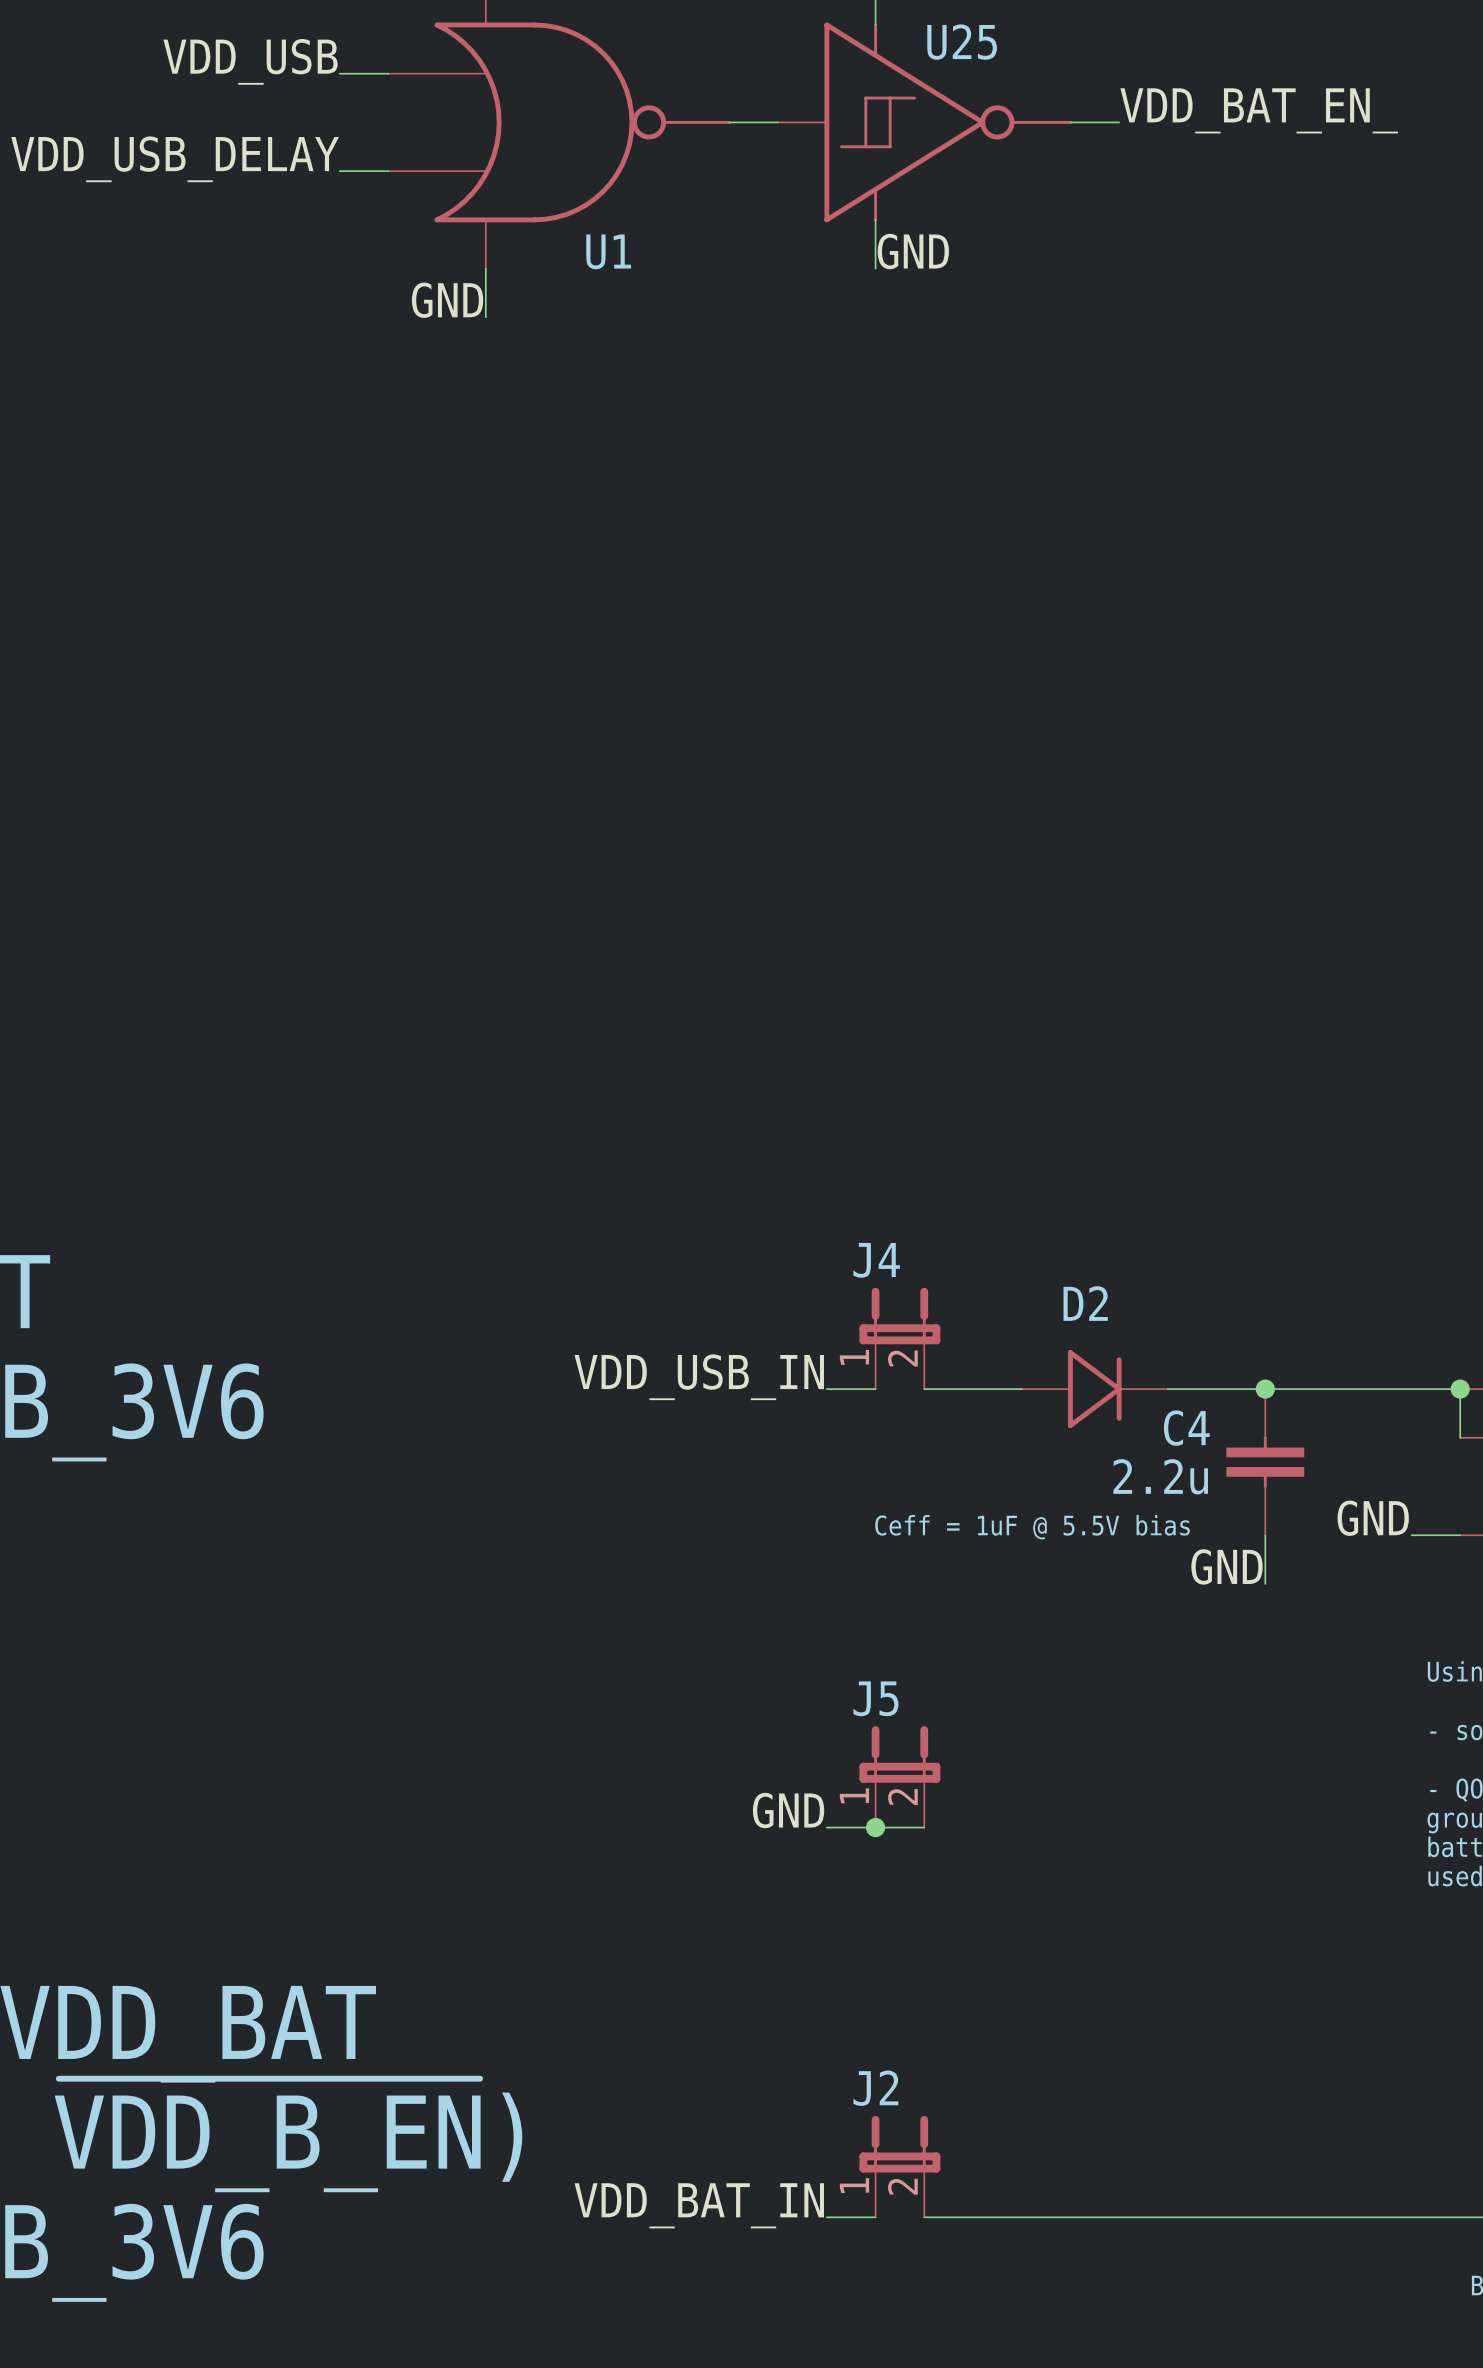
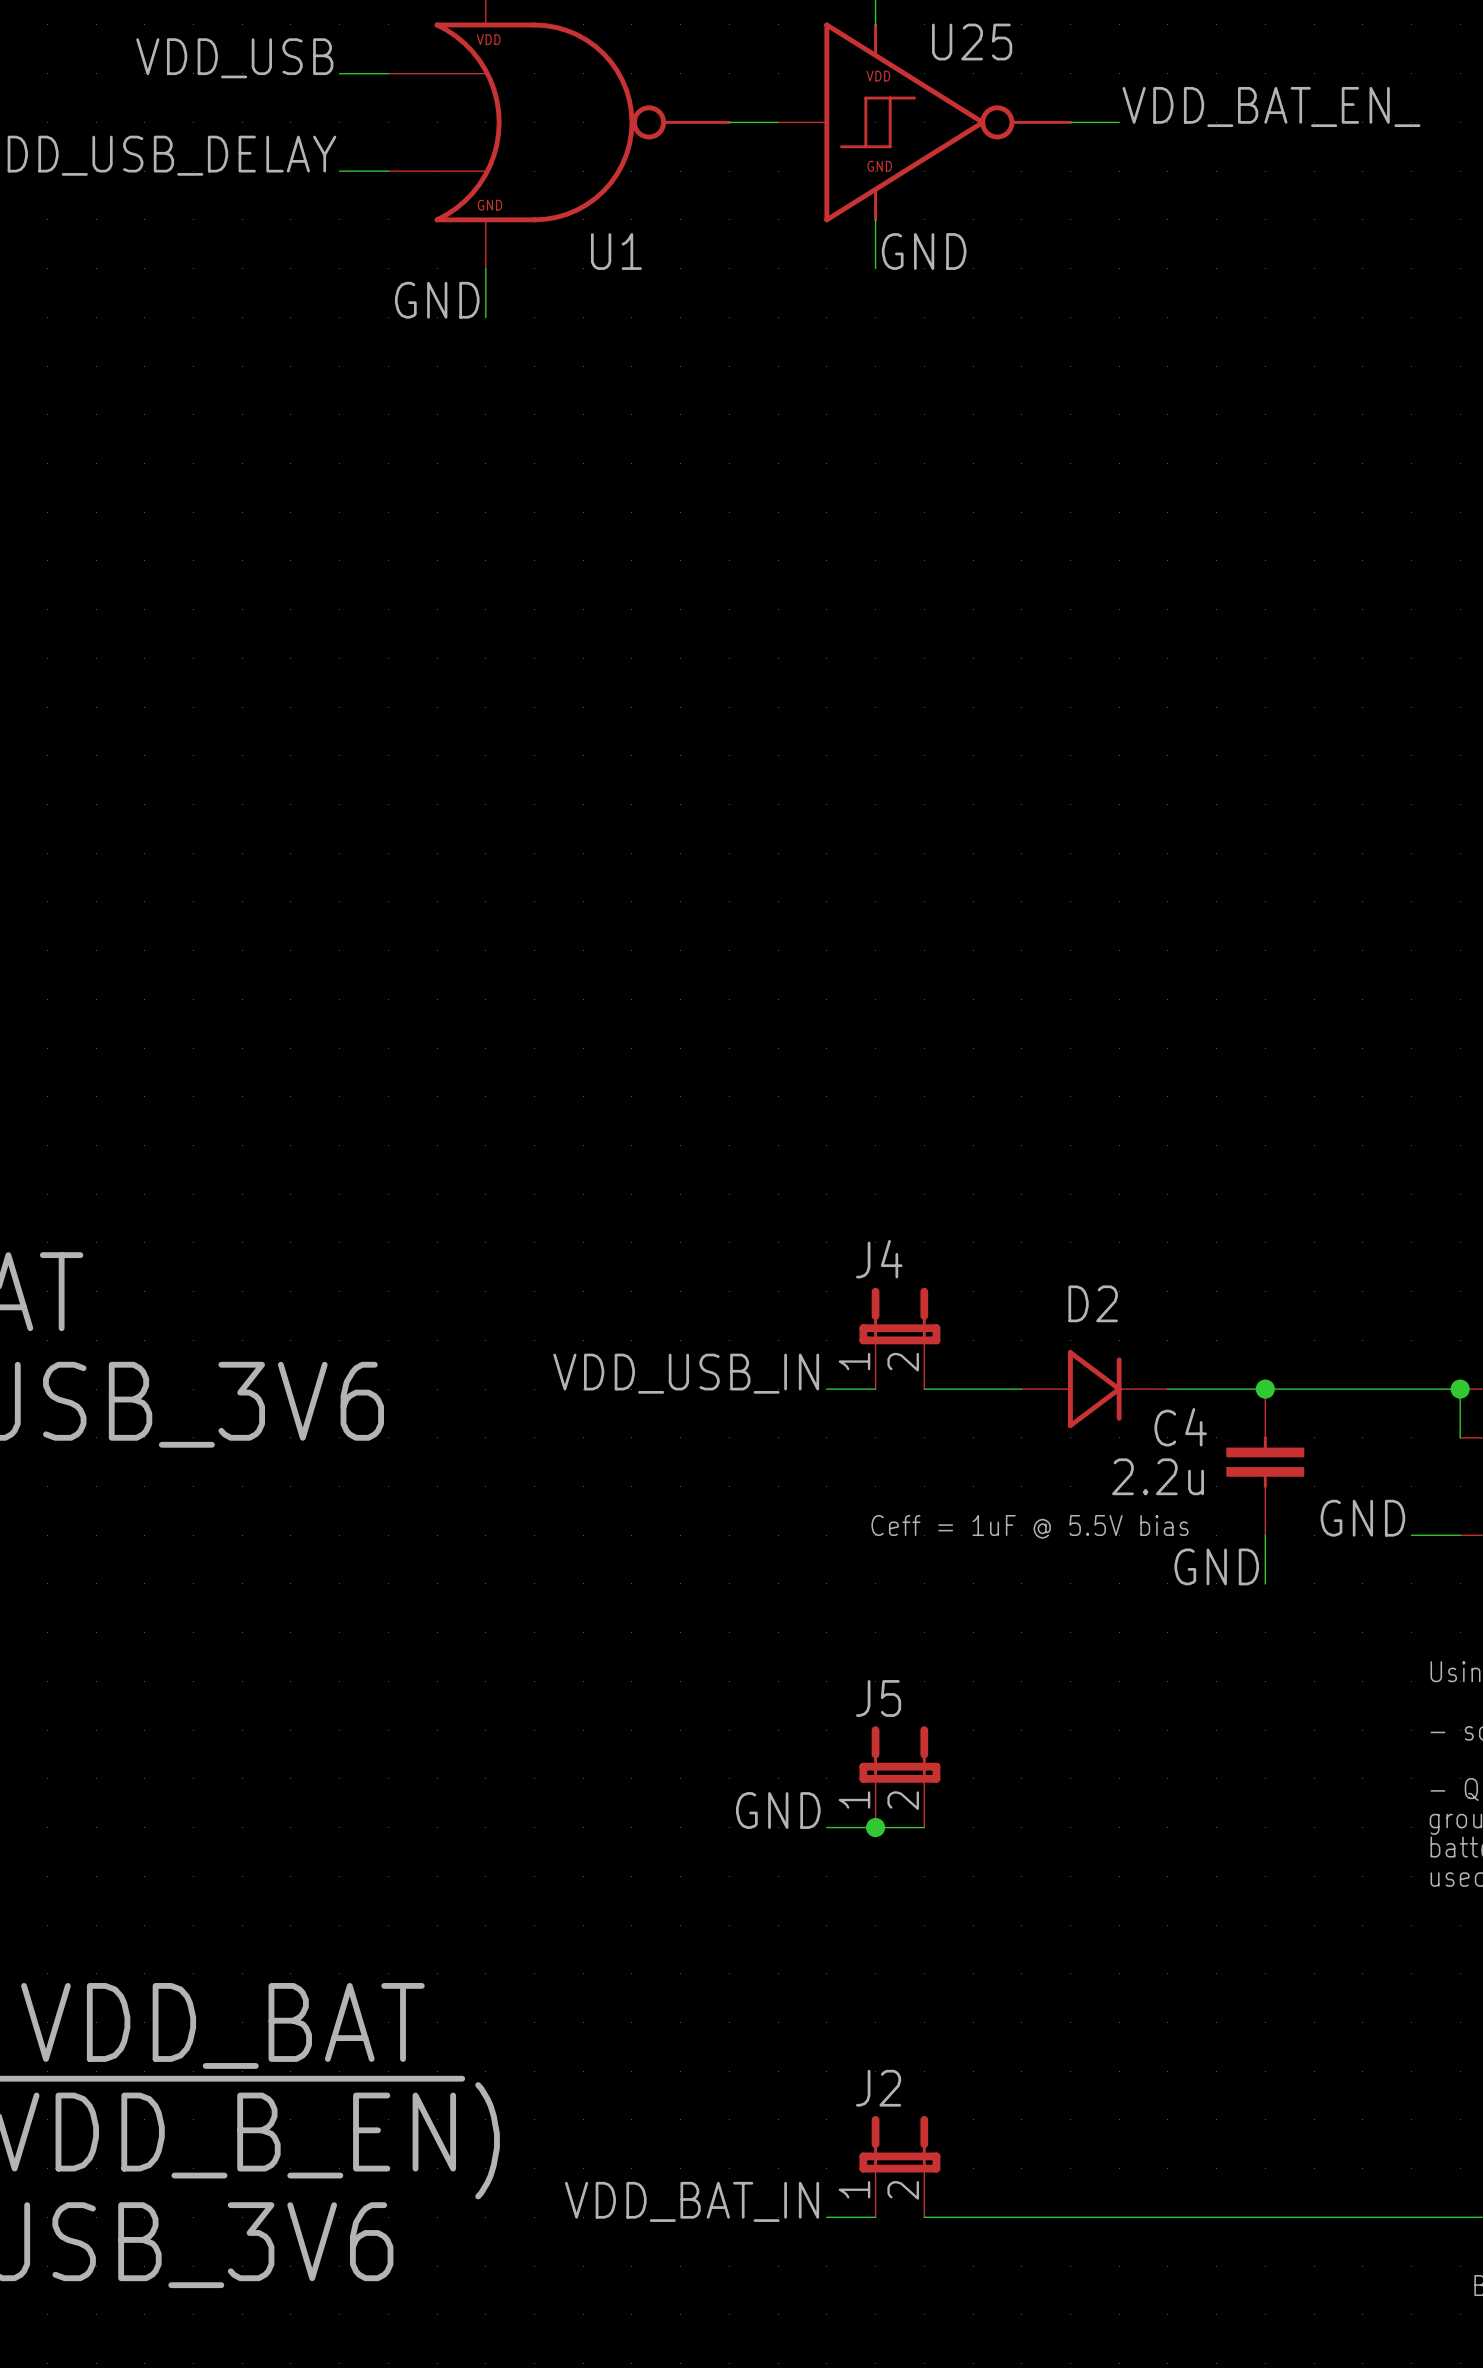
U1 text: none -> VDD (488, 39)
U25 text: none -> VDD (878, 76)
U25 text: none -> GND (879, 166)
U1 text: none -> GND (489, 205)

